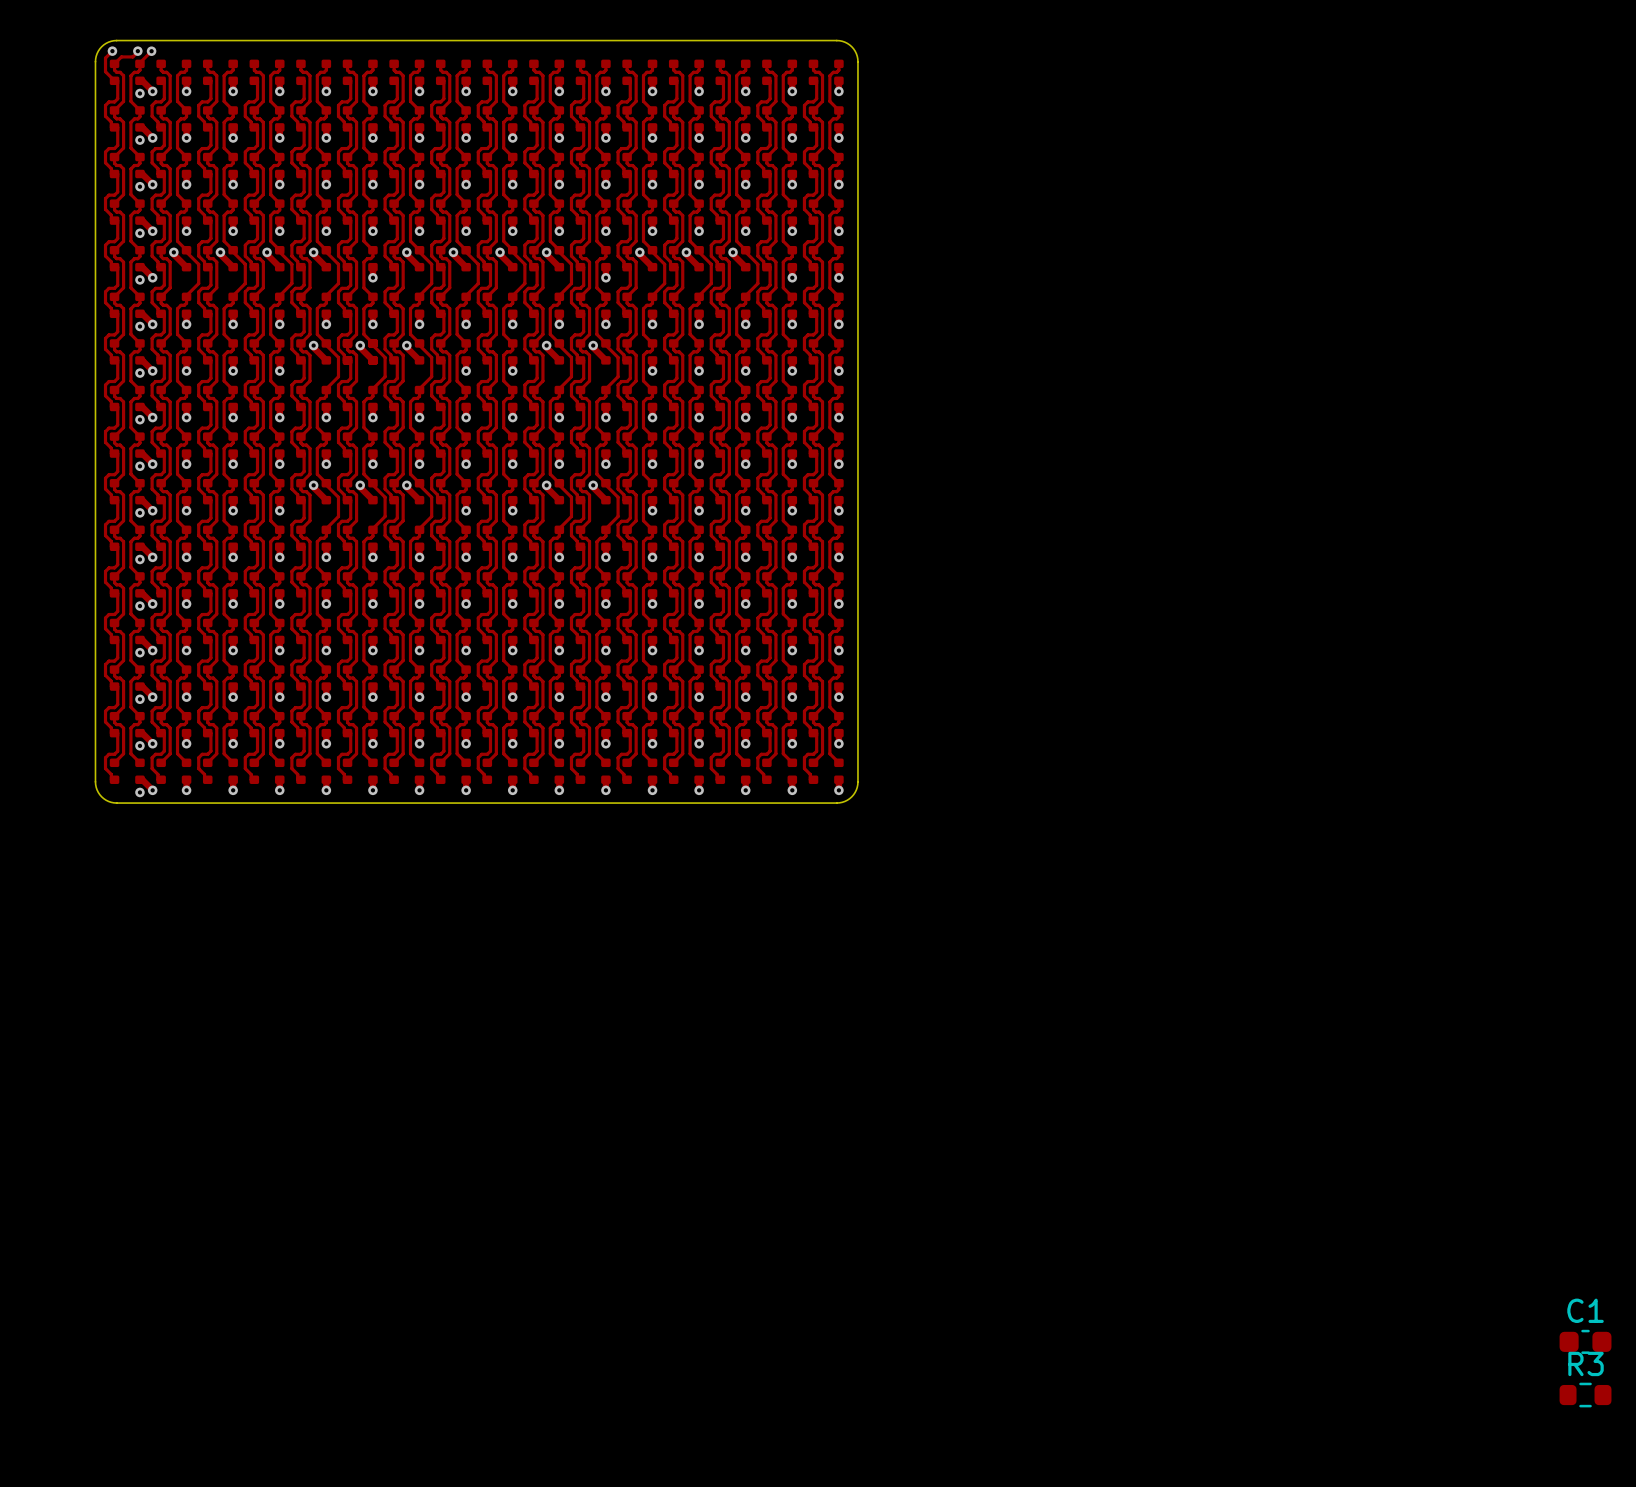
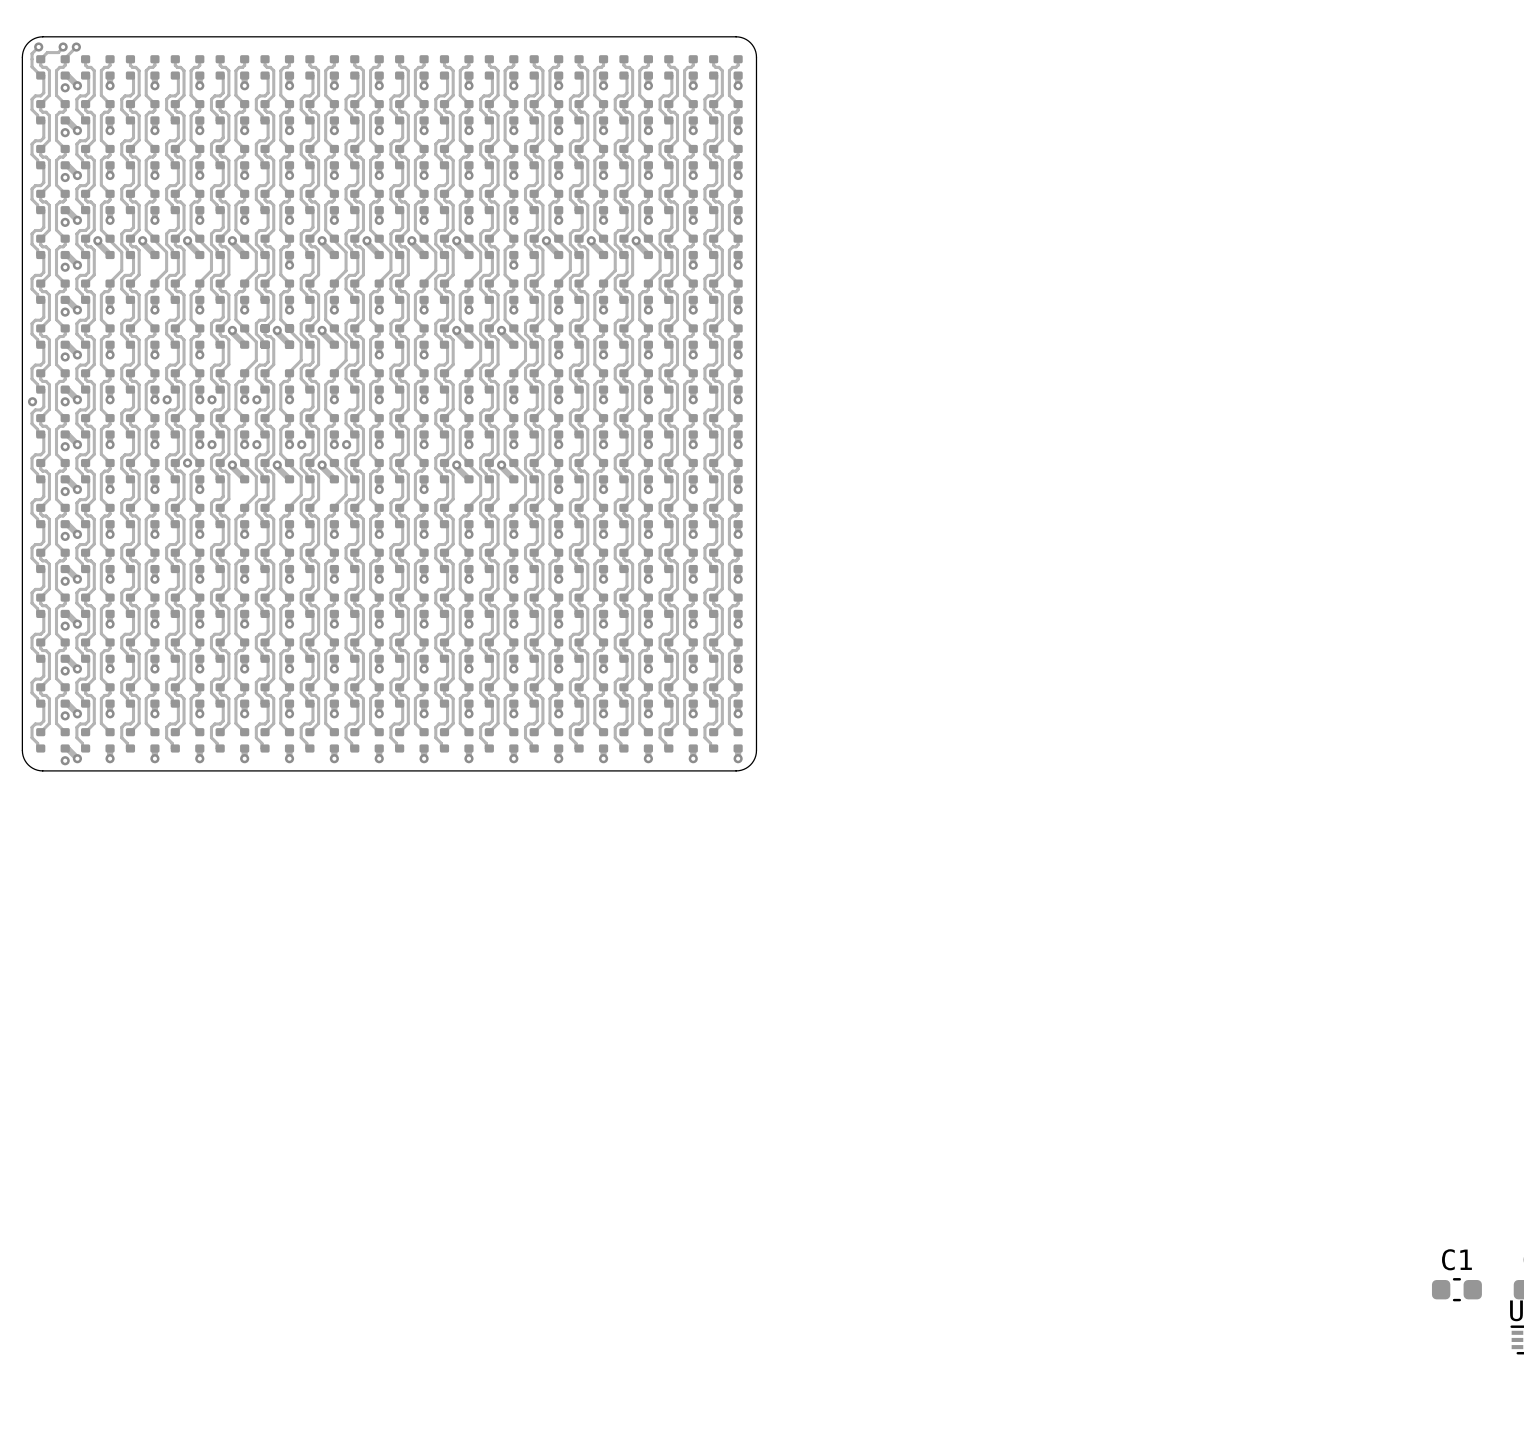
via: none -> (167, 399)
via: none -> (212, 399)
via: none -> (256, 399)
via: none -> (32, 401)
via: none -> (212, 444)
via: none -> (256, 444)
via: none -> (301, 444)
via: none -> (346, 444)
via: none -> (187, 463)
R3: (1585, 1395) -> none

